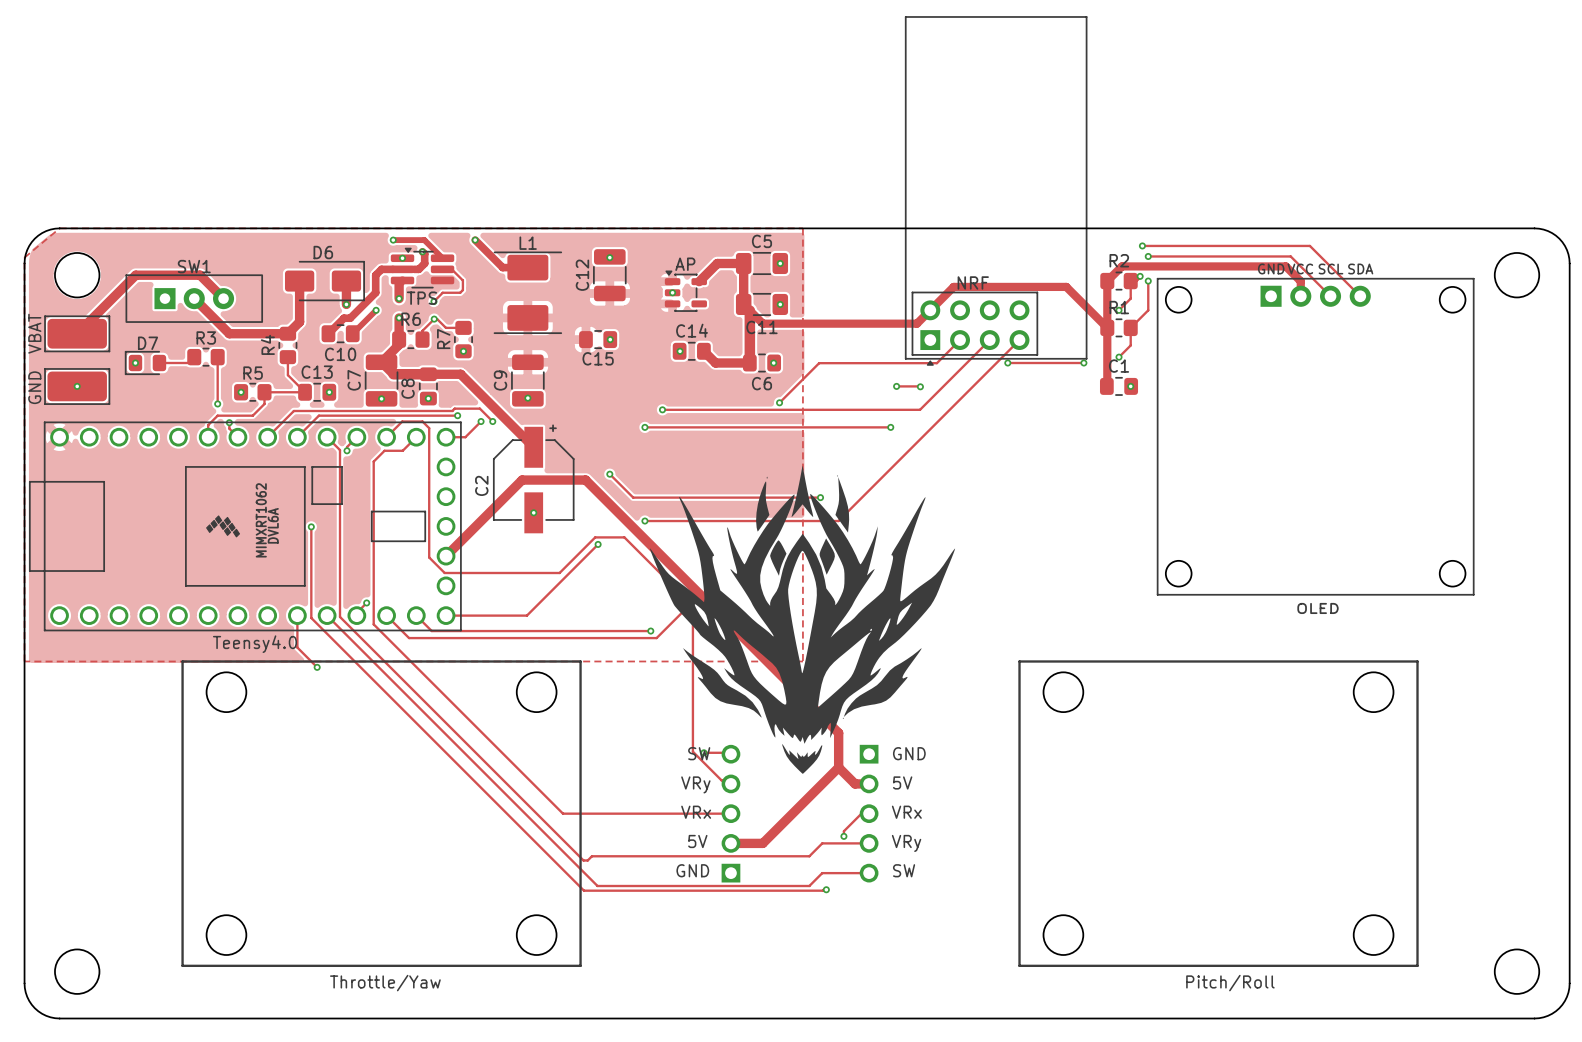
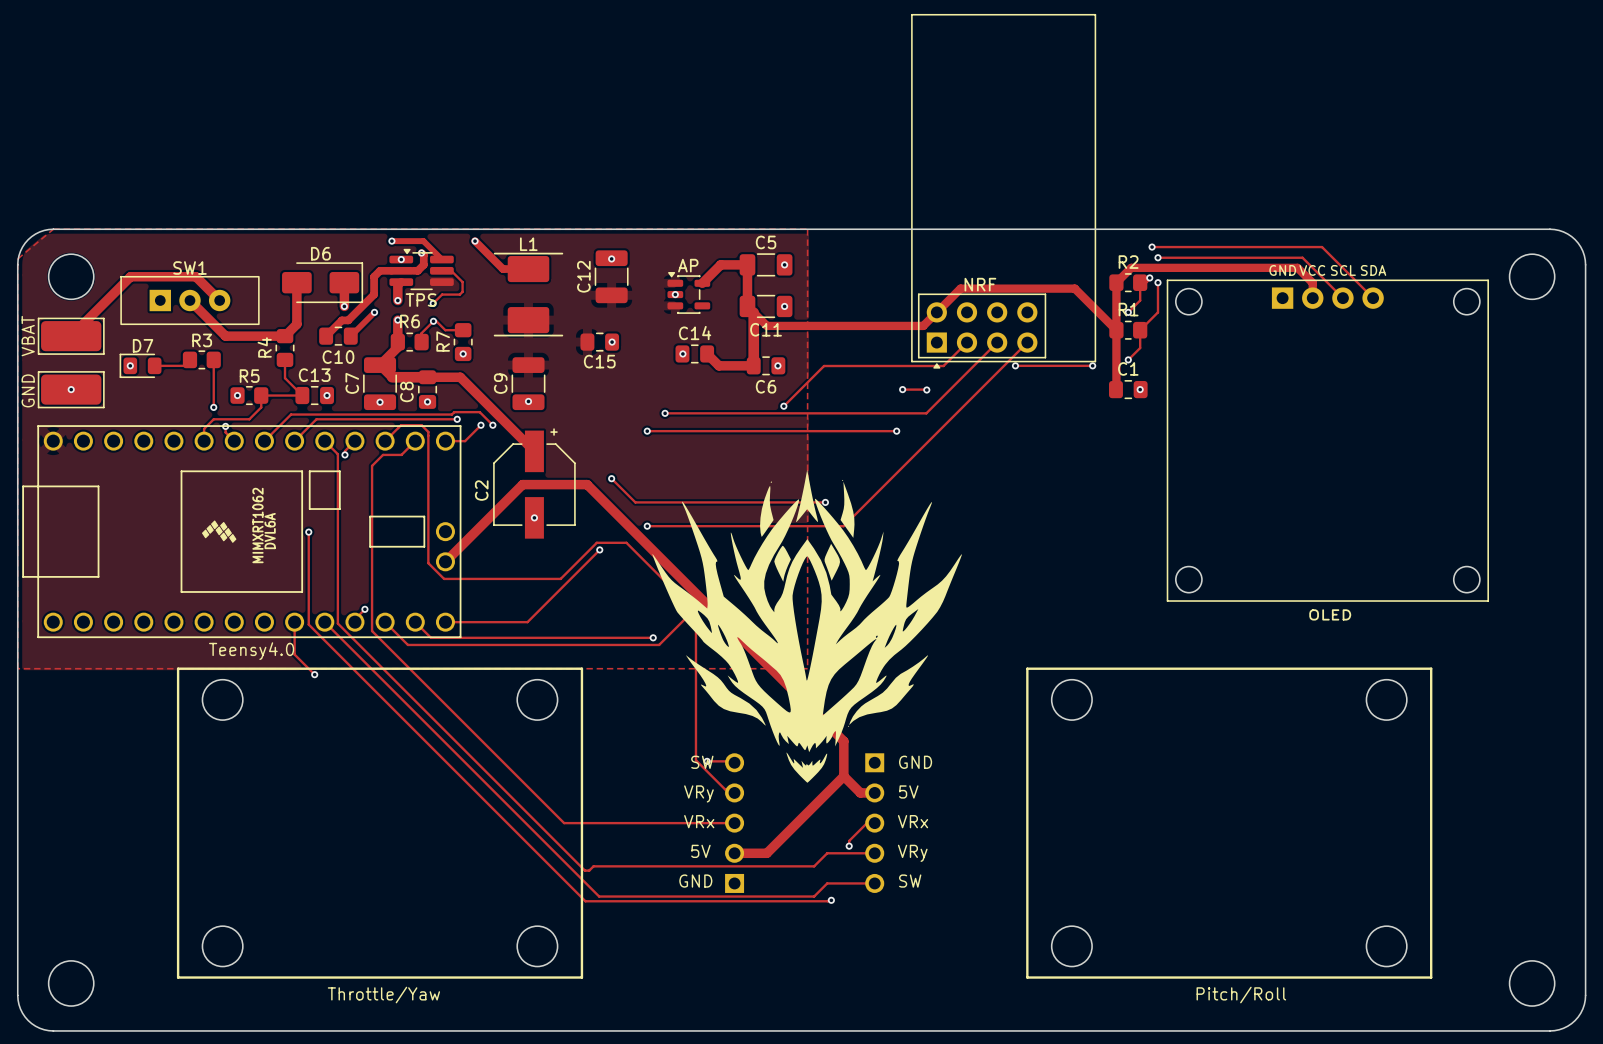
part footprint: [28, 421, 462, 632] -> [22, 425, 462, 639]

